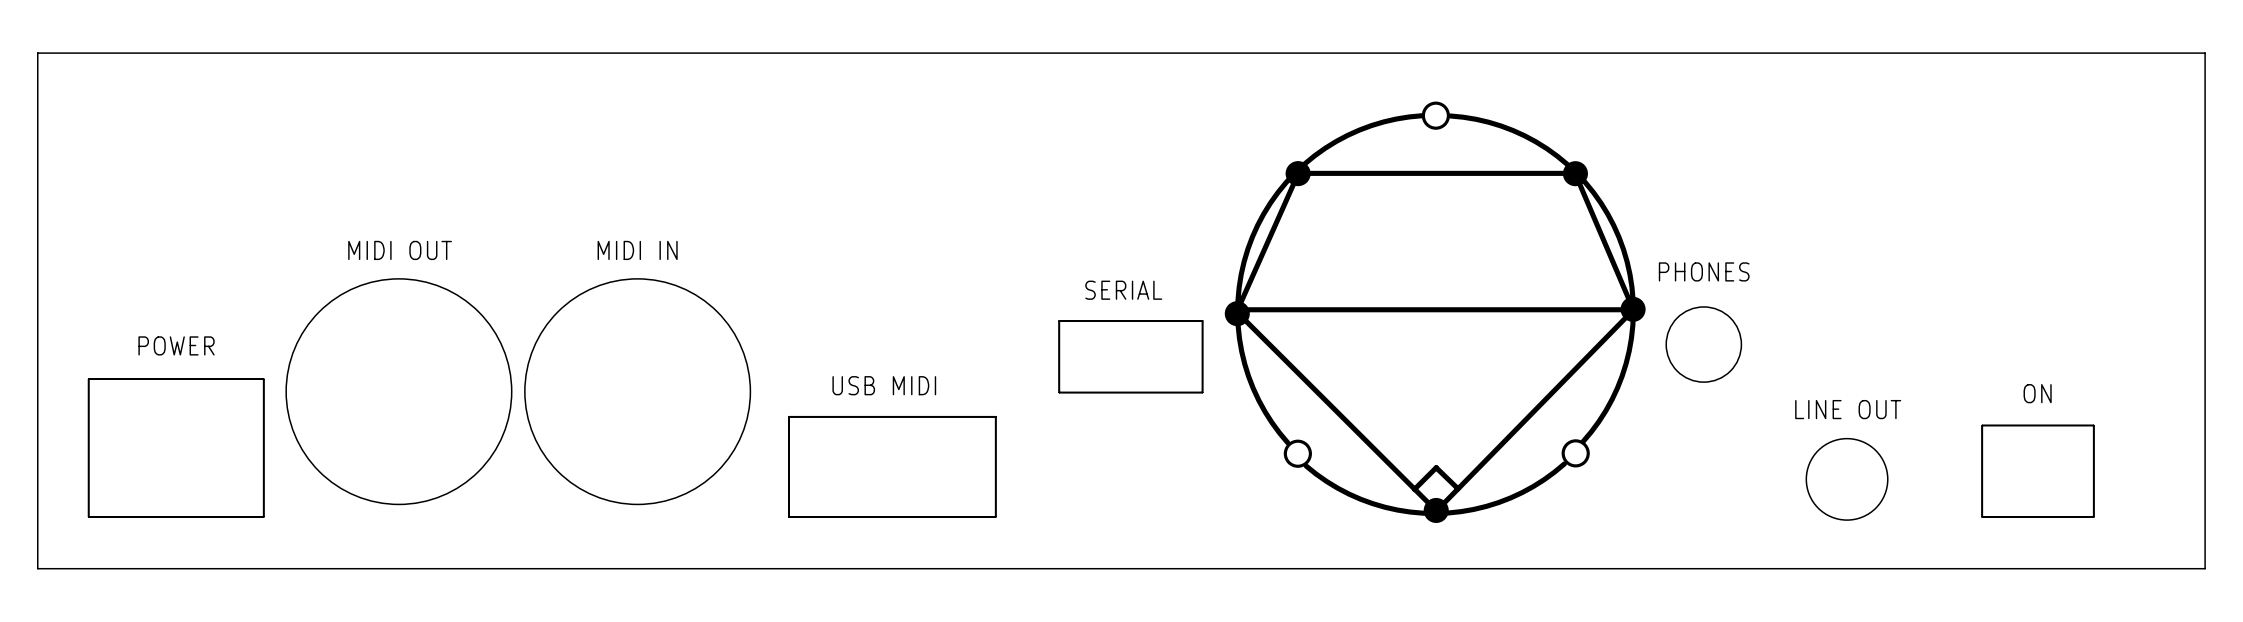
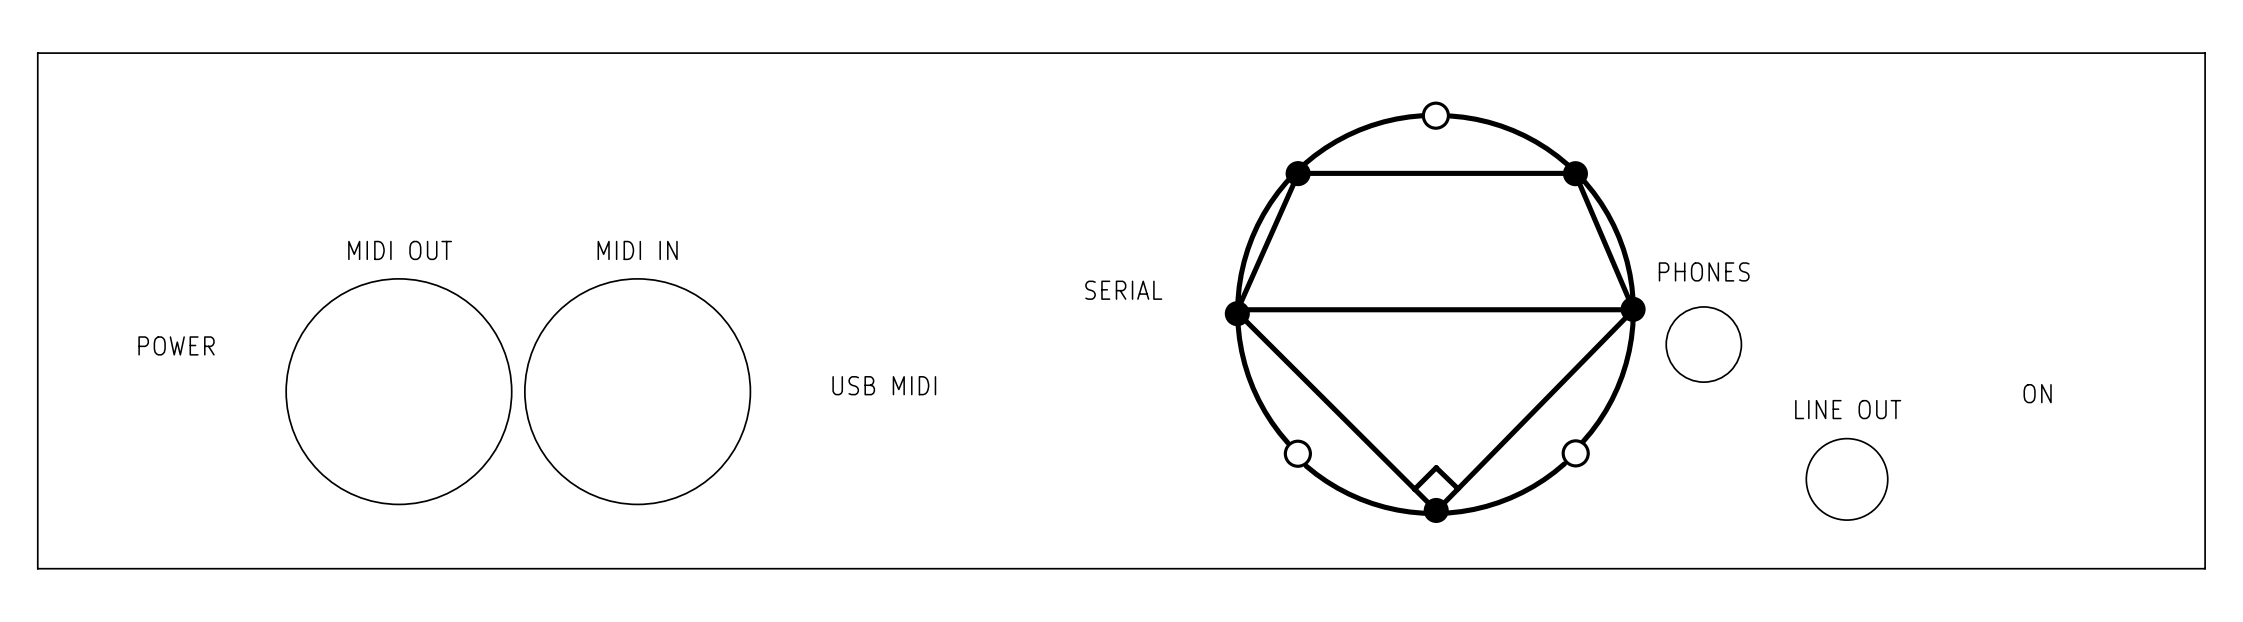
board edge: (1202, 320) (1059, 320) (1059, 392) (1202, 392) (1202, 320) -> none
board edge: (263, 379) (88, 379) (88, 516) (263, 516) (263, 379) -> none
board edge: (995, 416) (788, 416) (788, 516) (995, 516) (995, 416) -> none
board edge: (2093, 425) (1982, 425) (1982, 516) (2093, 516) (2093, 425) -> none

